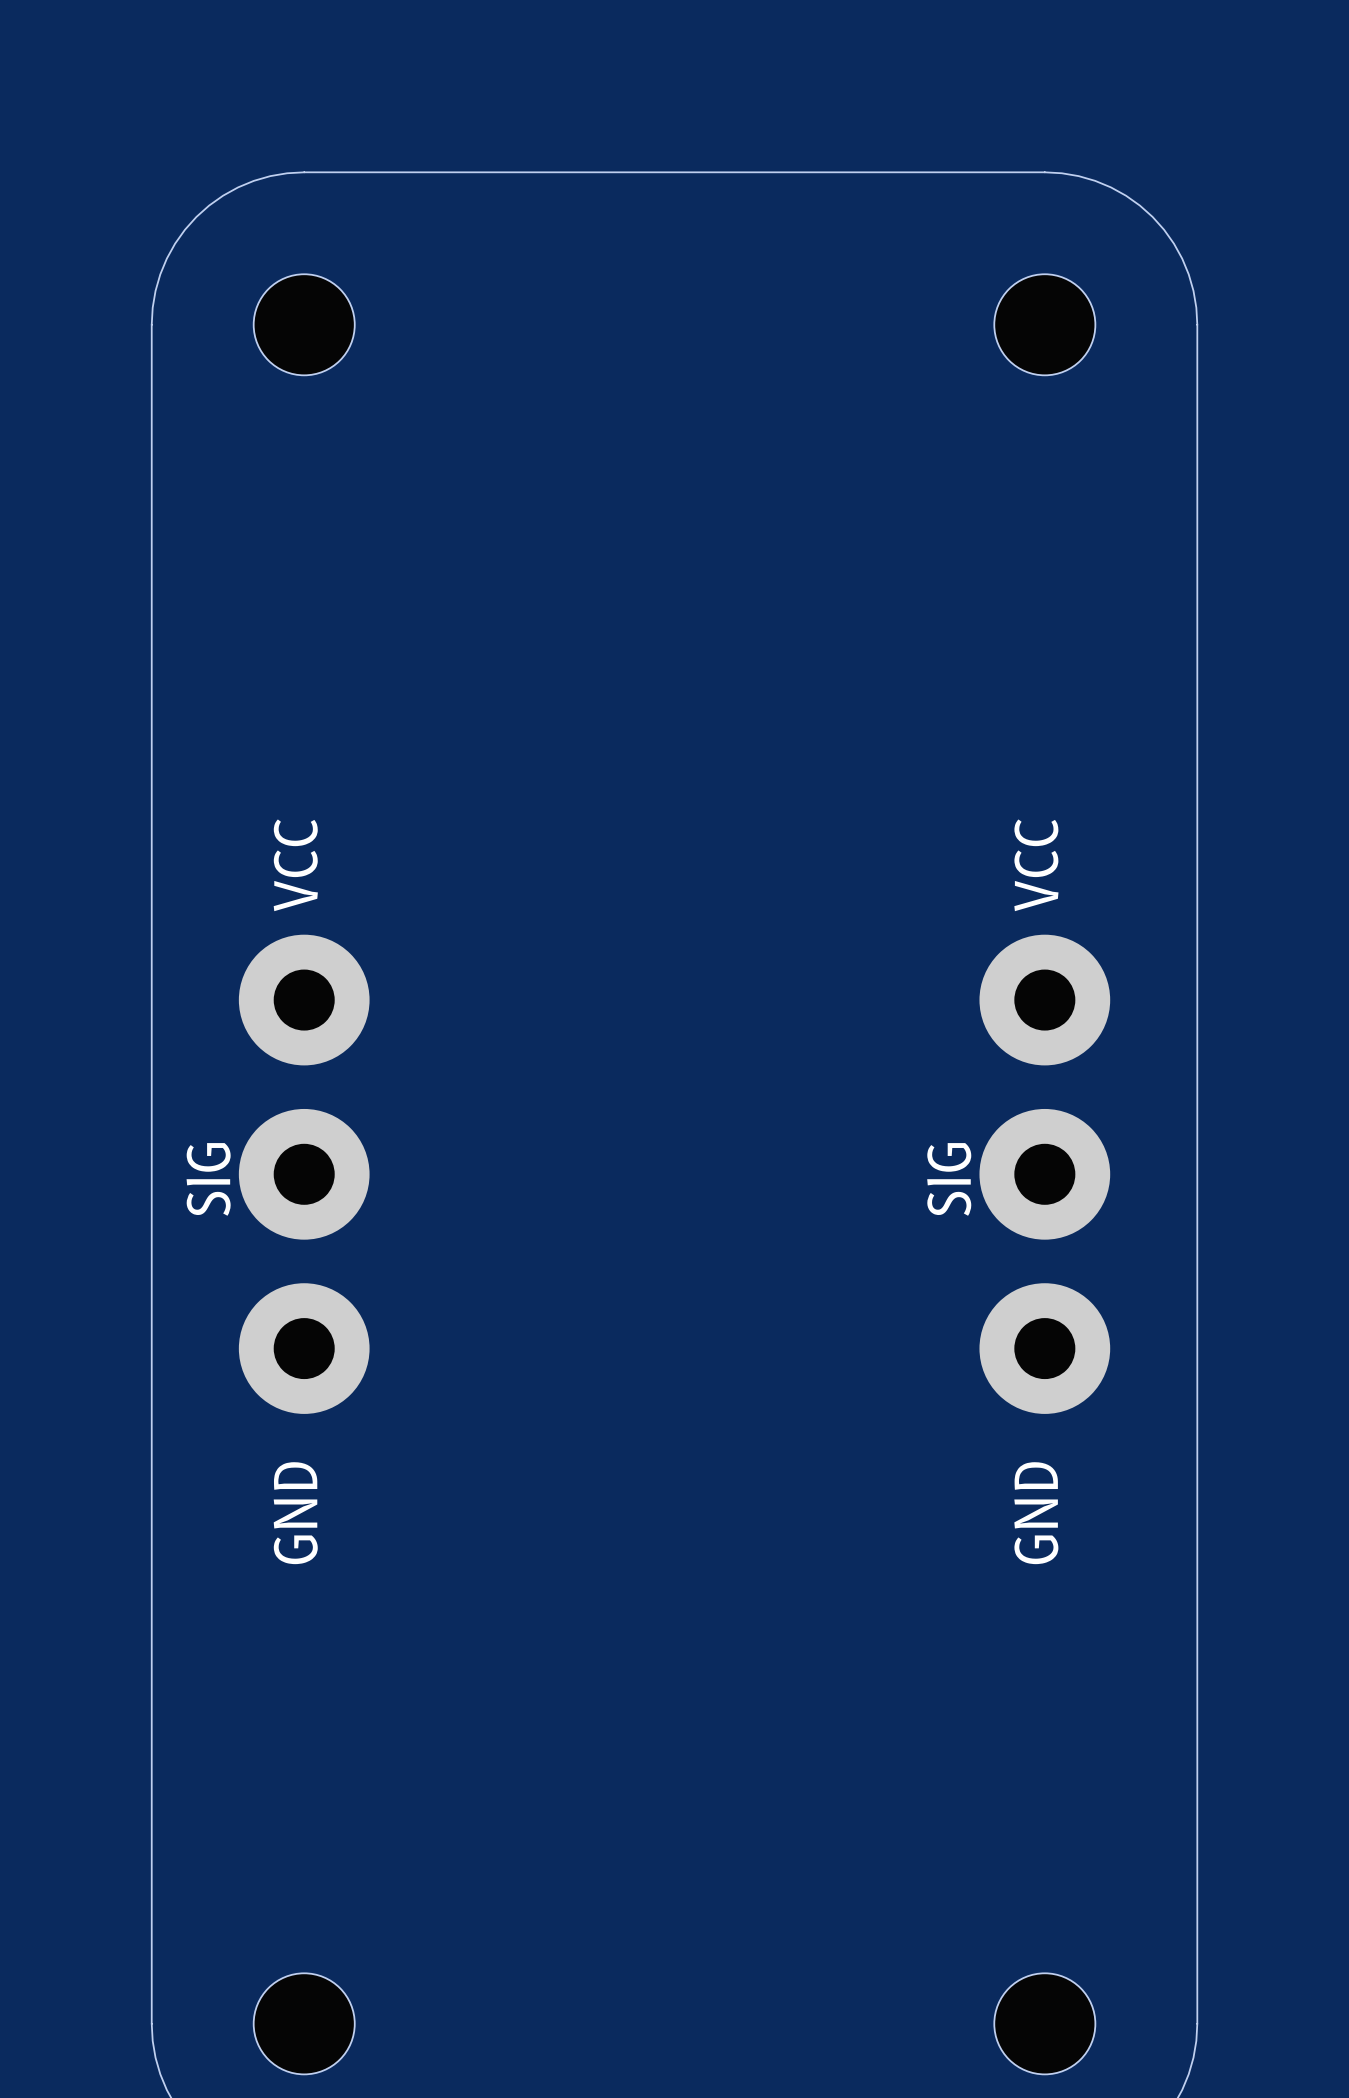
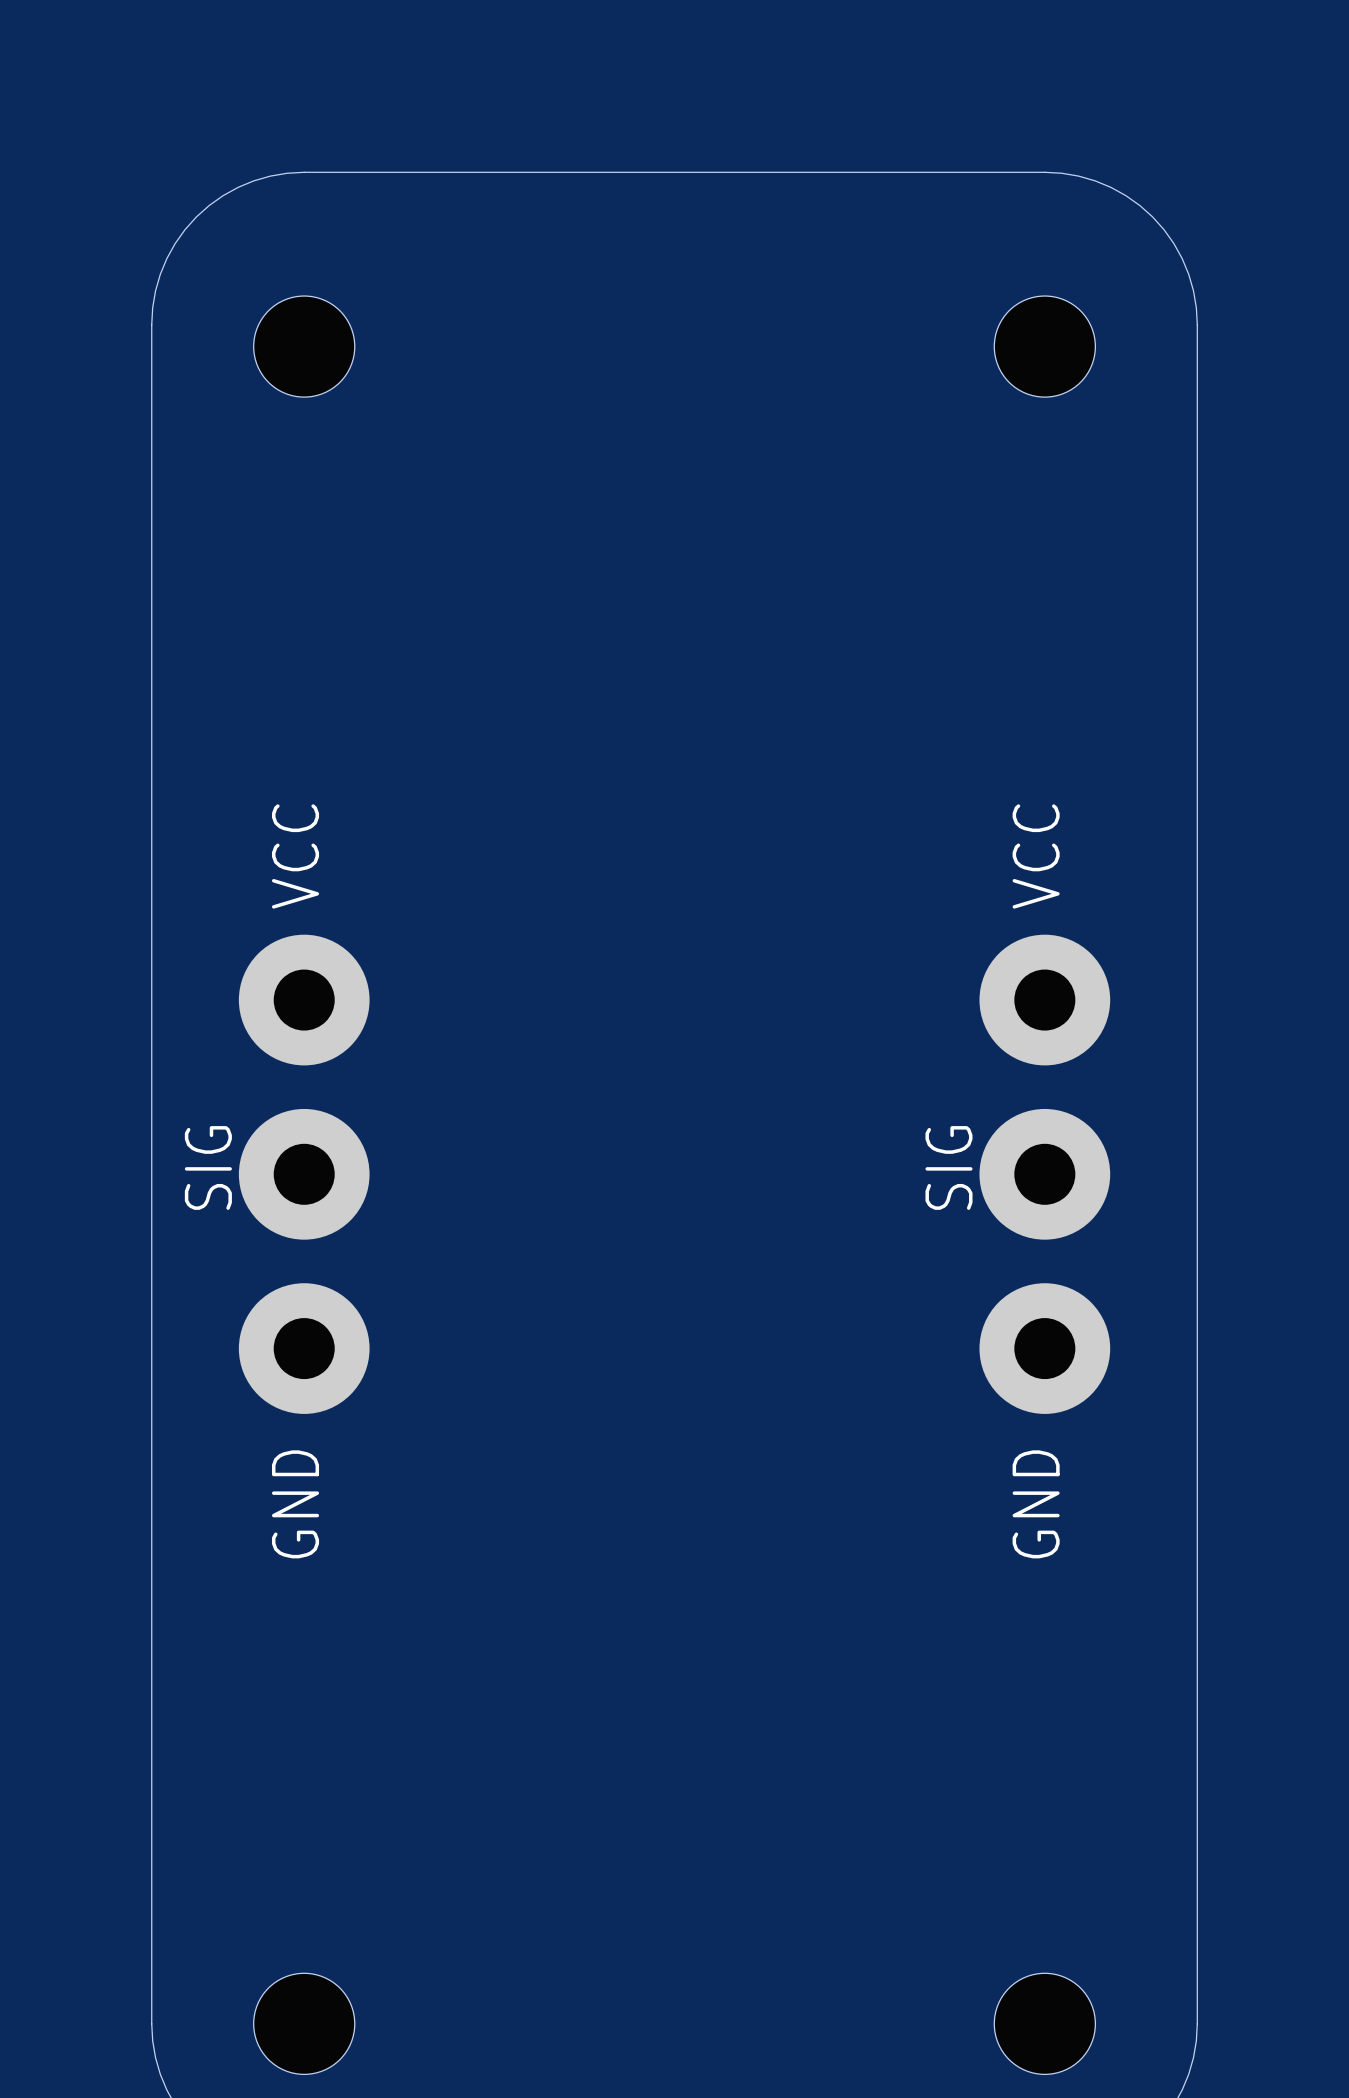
hole position: (304, 324) -> (304, 346)
hole position: (1044, 324) -> (1044, 346)

